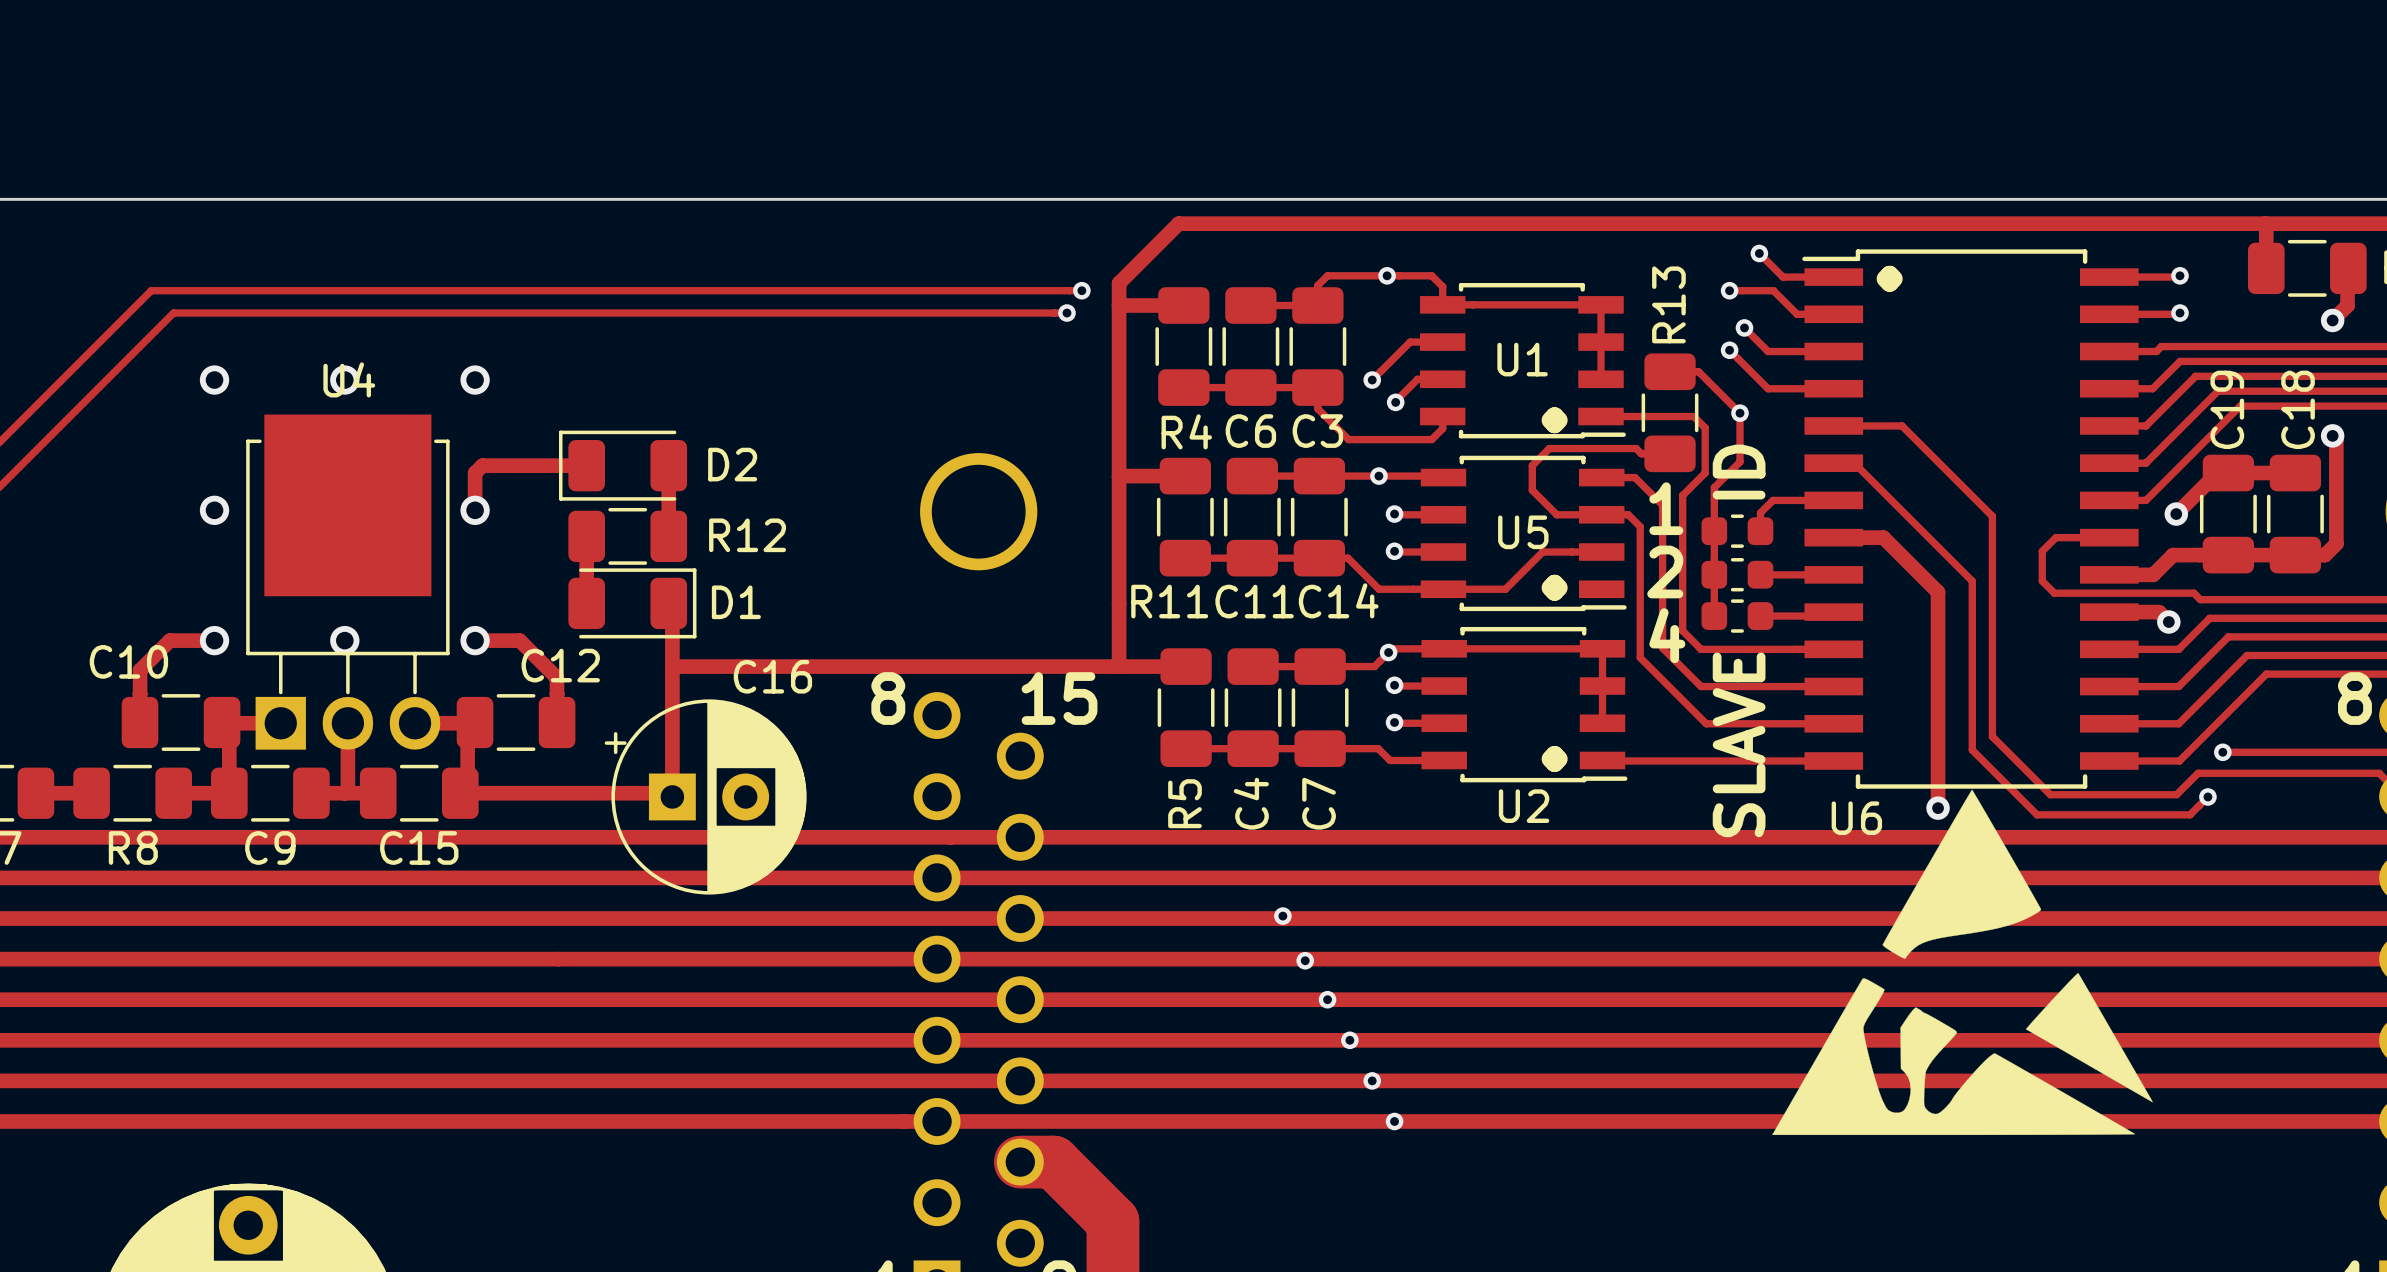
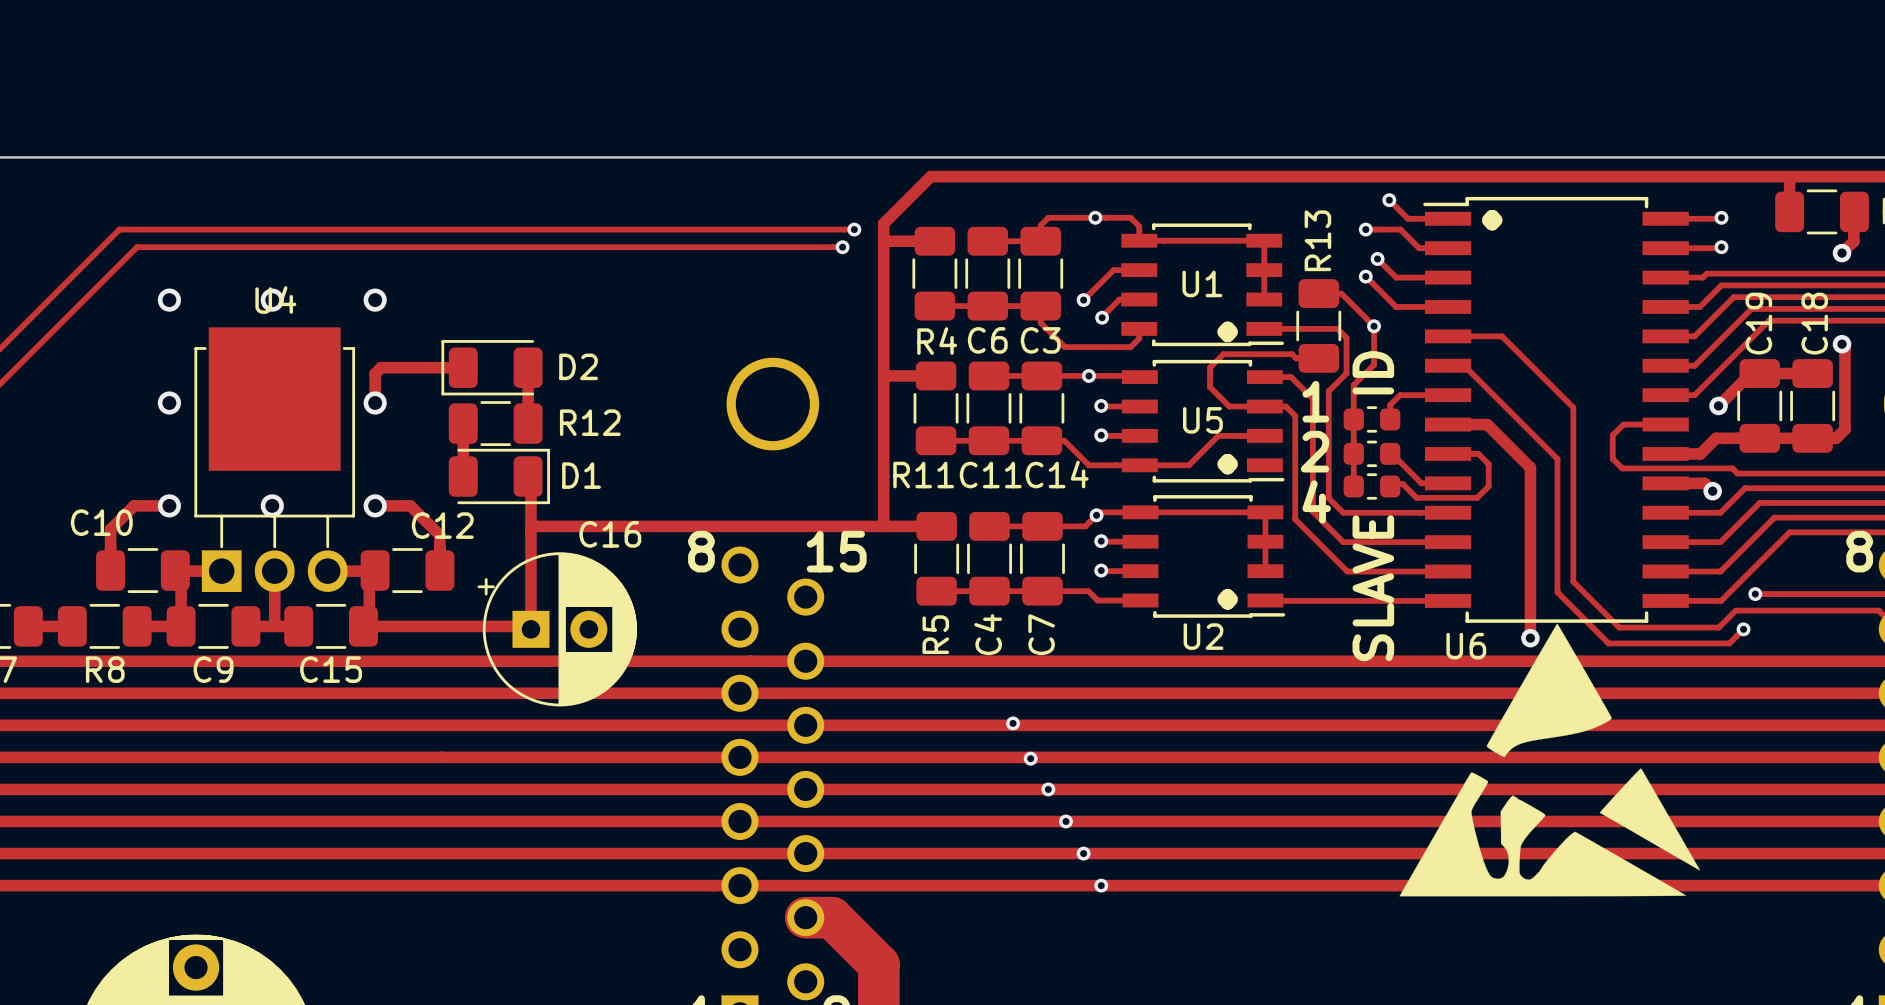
track: (1760, 574) (1833, 574) -> (1390, 484) (1402, 484) (1416, 497) (1477, 497) (1488, 486) (1488, 464) (1478, 453) (1448, 453)
track: (1833, 612) (1829, 616) (1760, 616) -> (1448, 483) (1421, 483) (1390, 451)

